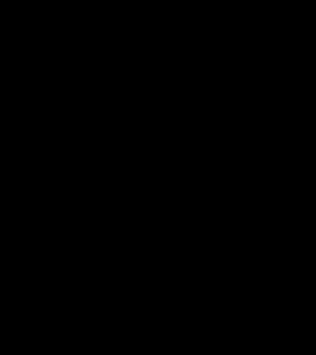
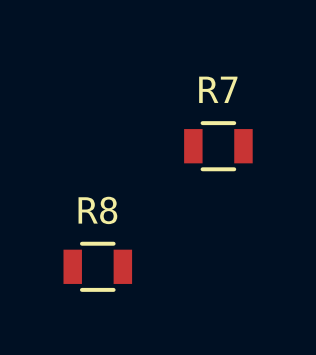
R7: none -> (218, 146)
R8: none -> (97, 266)

